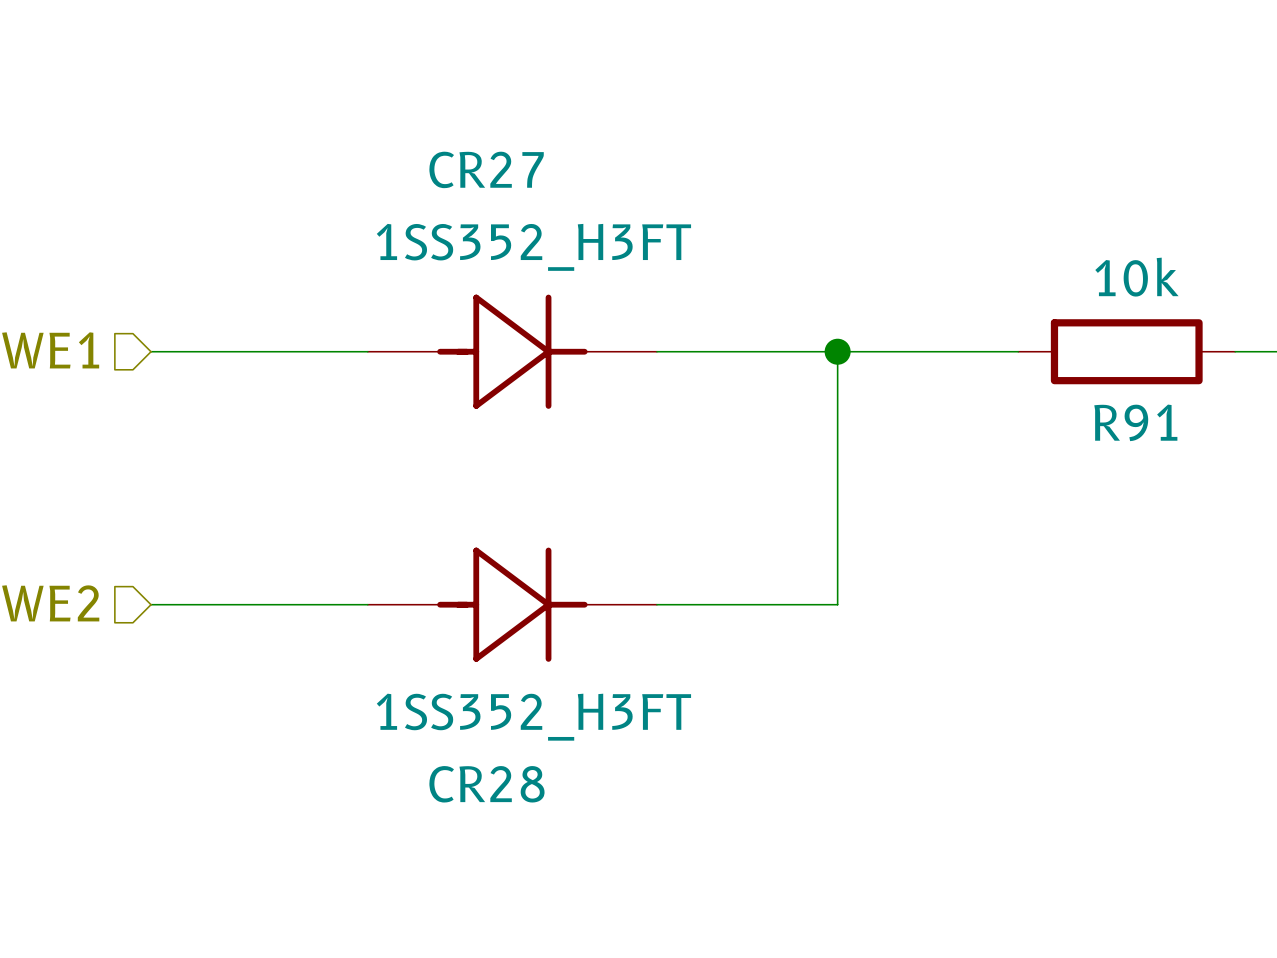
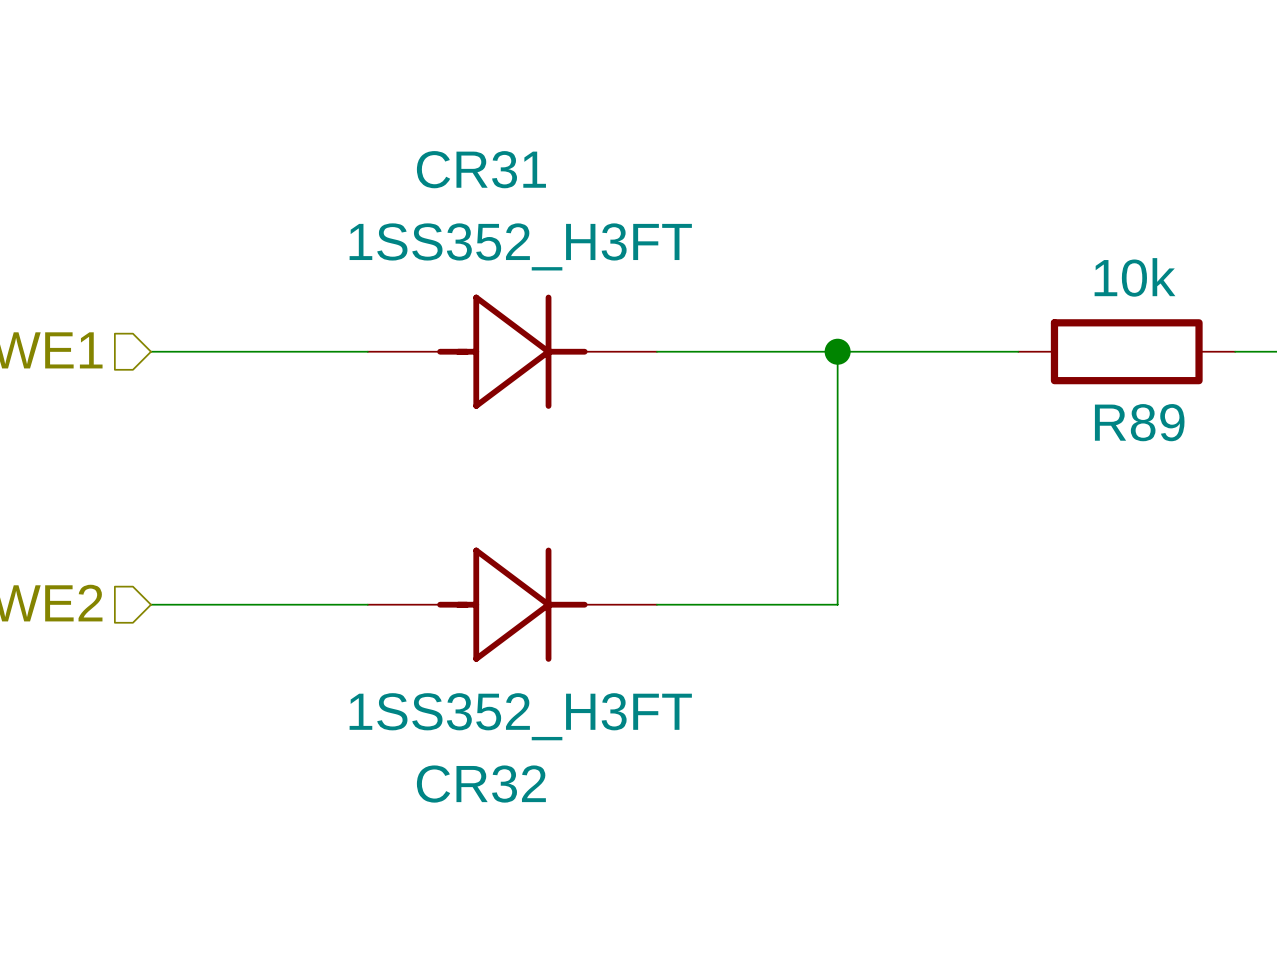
CR27 name: CR27 (486, 169) -> CR31 (481, 169)
R91 name: R91 (1135, 422) -> R89 (1139, 422)
CR28 name: CR28 (486, 784) -> CR32 (481, 784)

